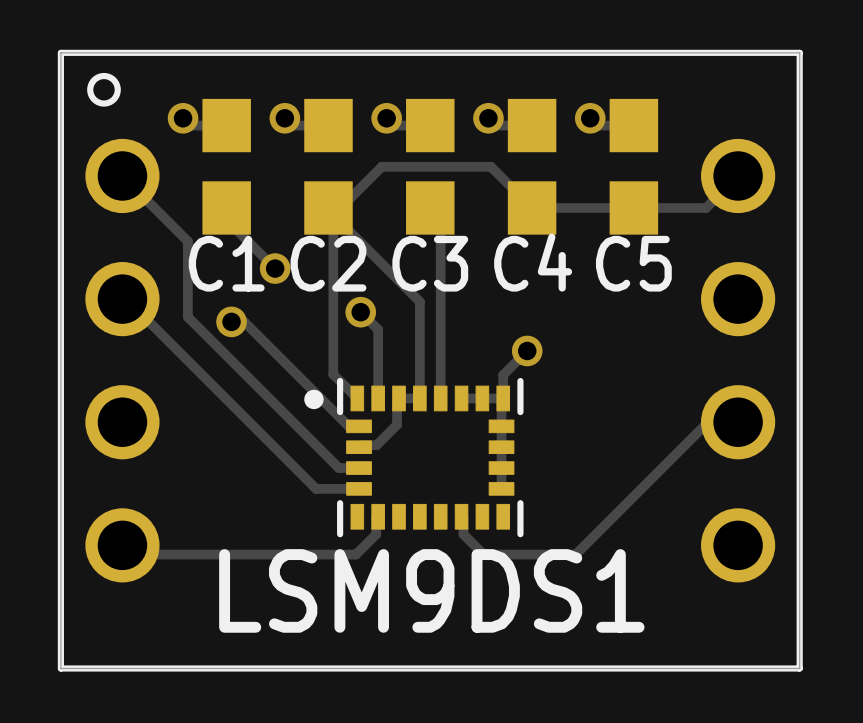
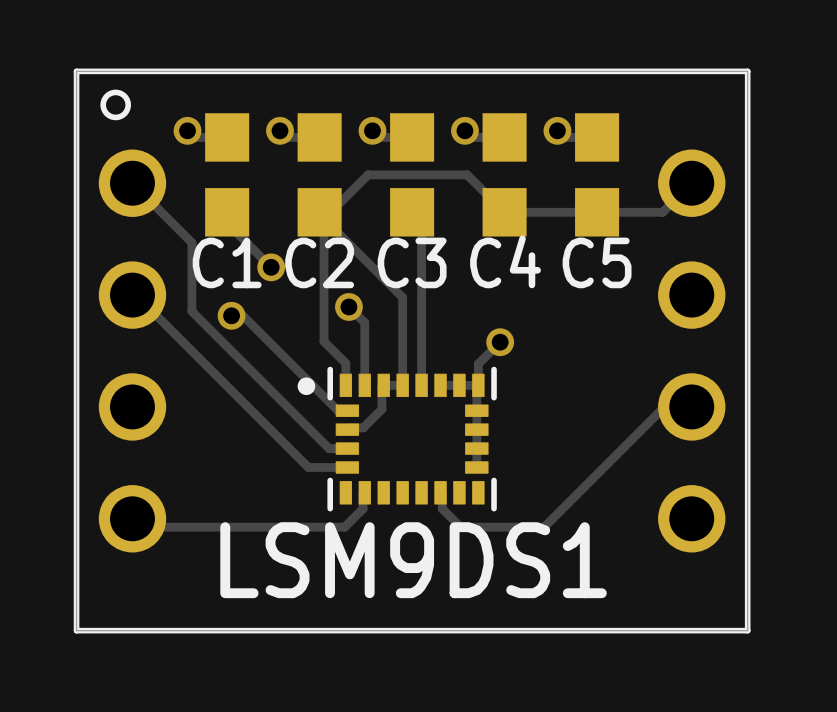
track: (333, 350) (333, 374) (357, 398) -> (324, 341) (345, 363) (345, 385)

